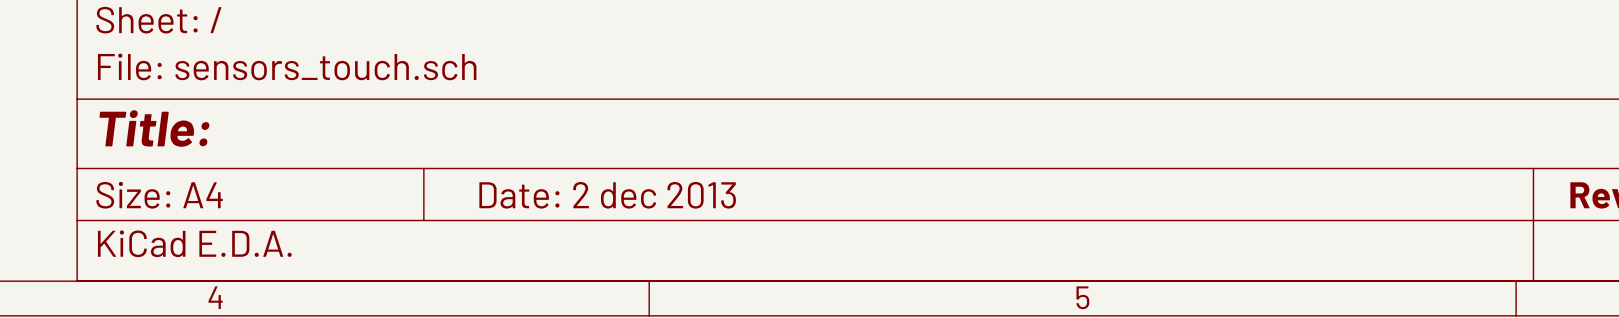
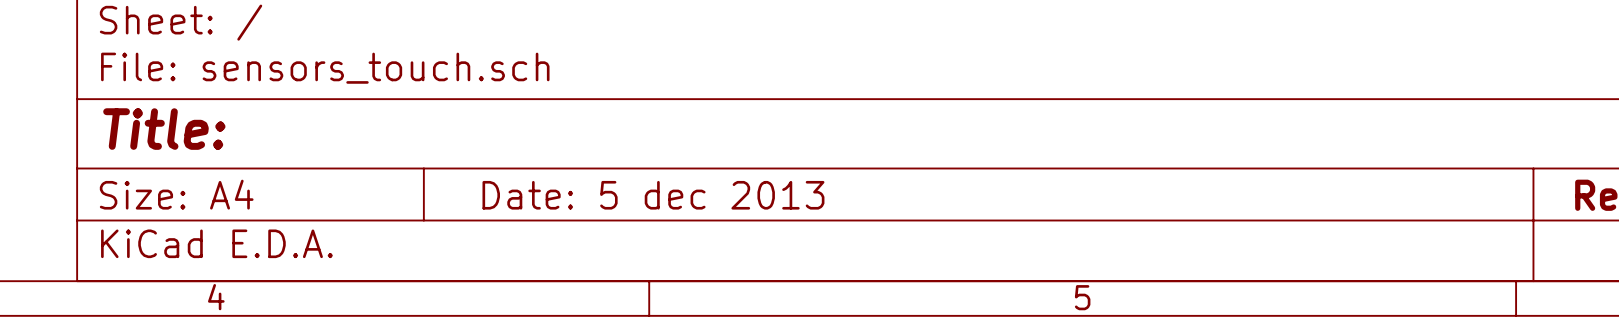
title block: Date: 2 dec 2013 (607, 195) -> Date: 5 dec 2013 (653, 195)

